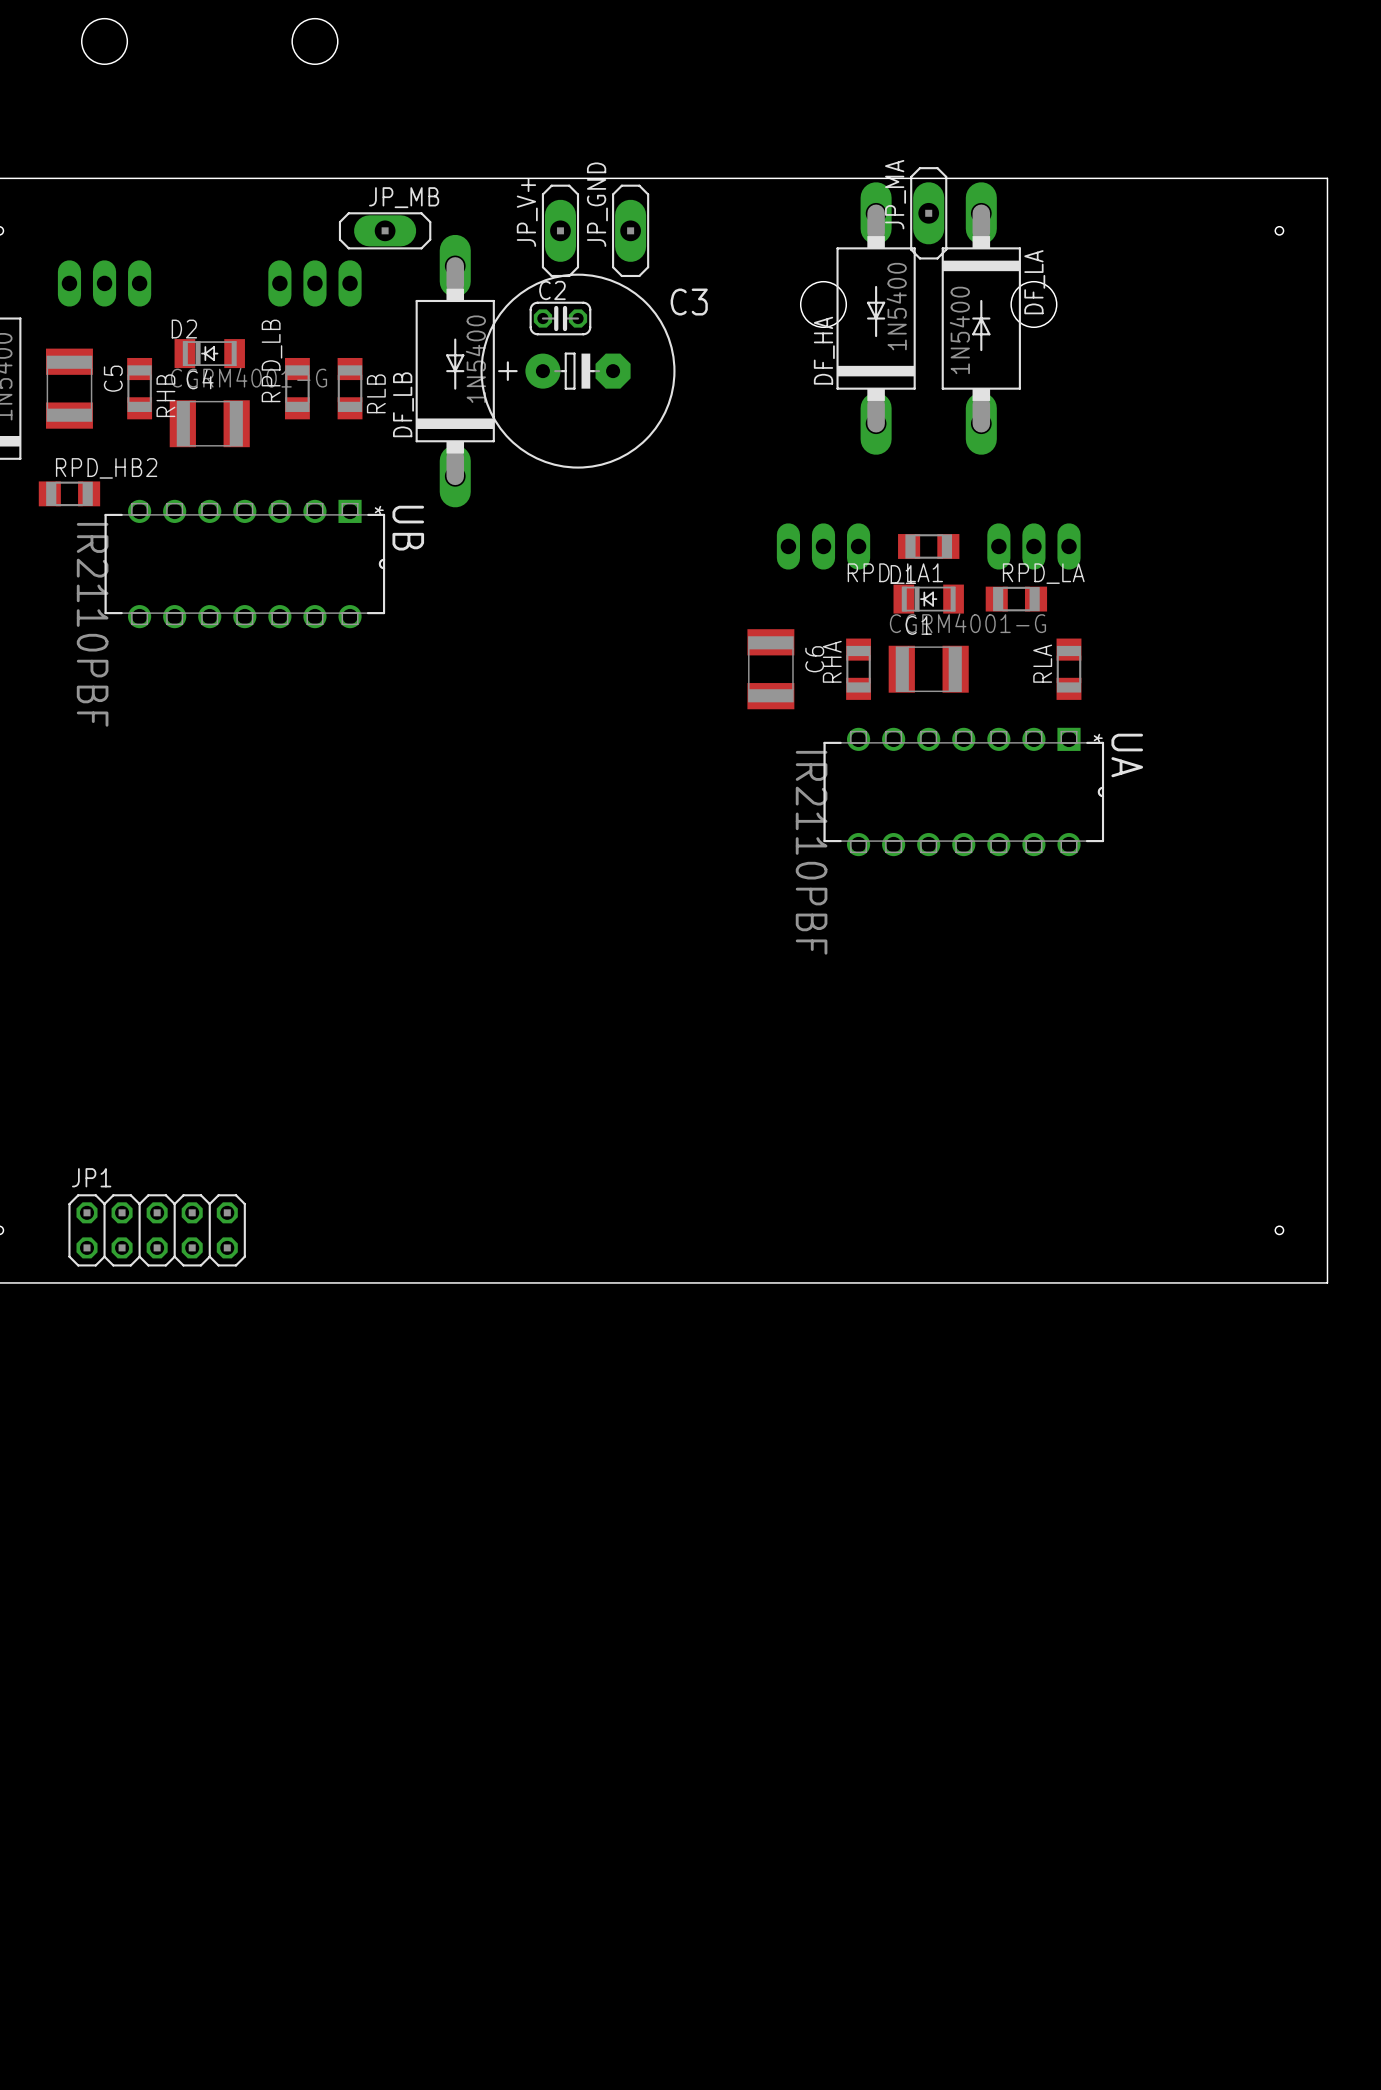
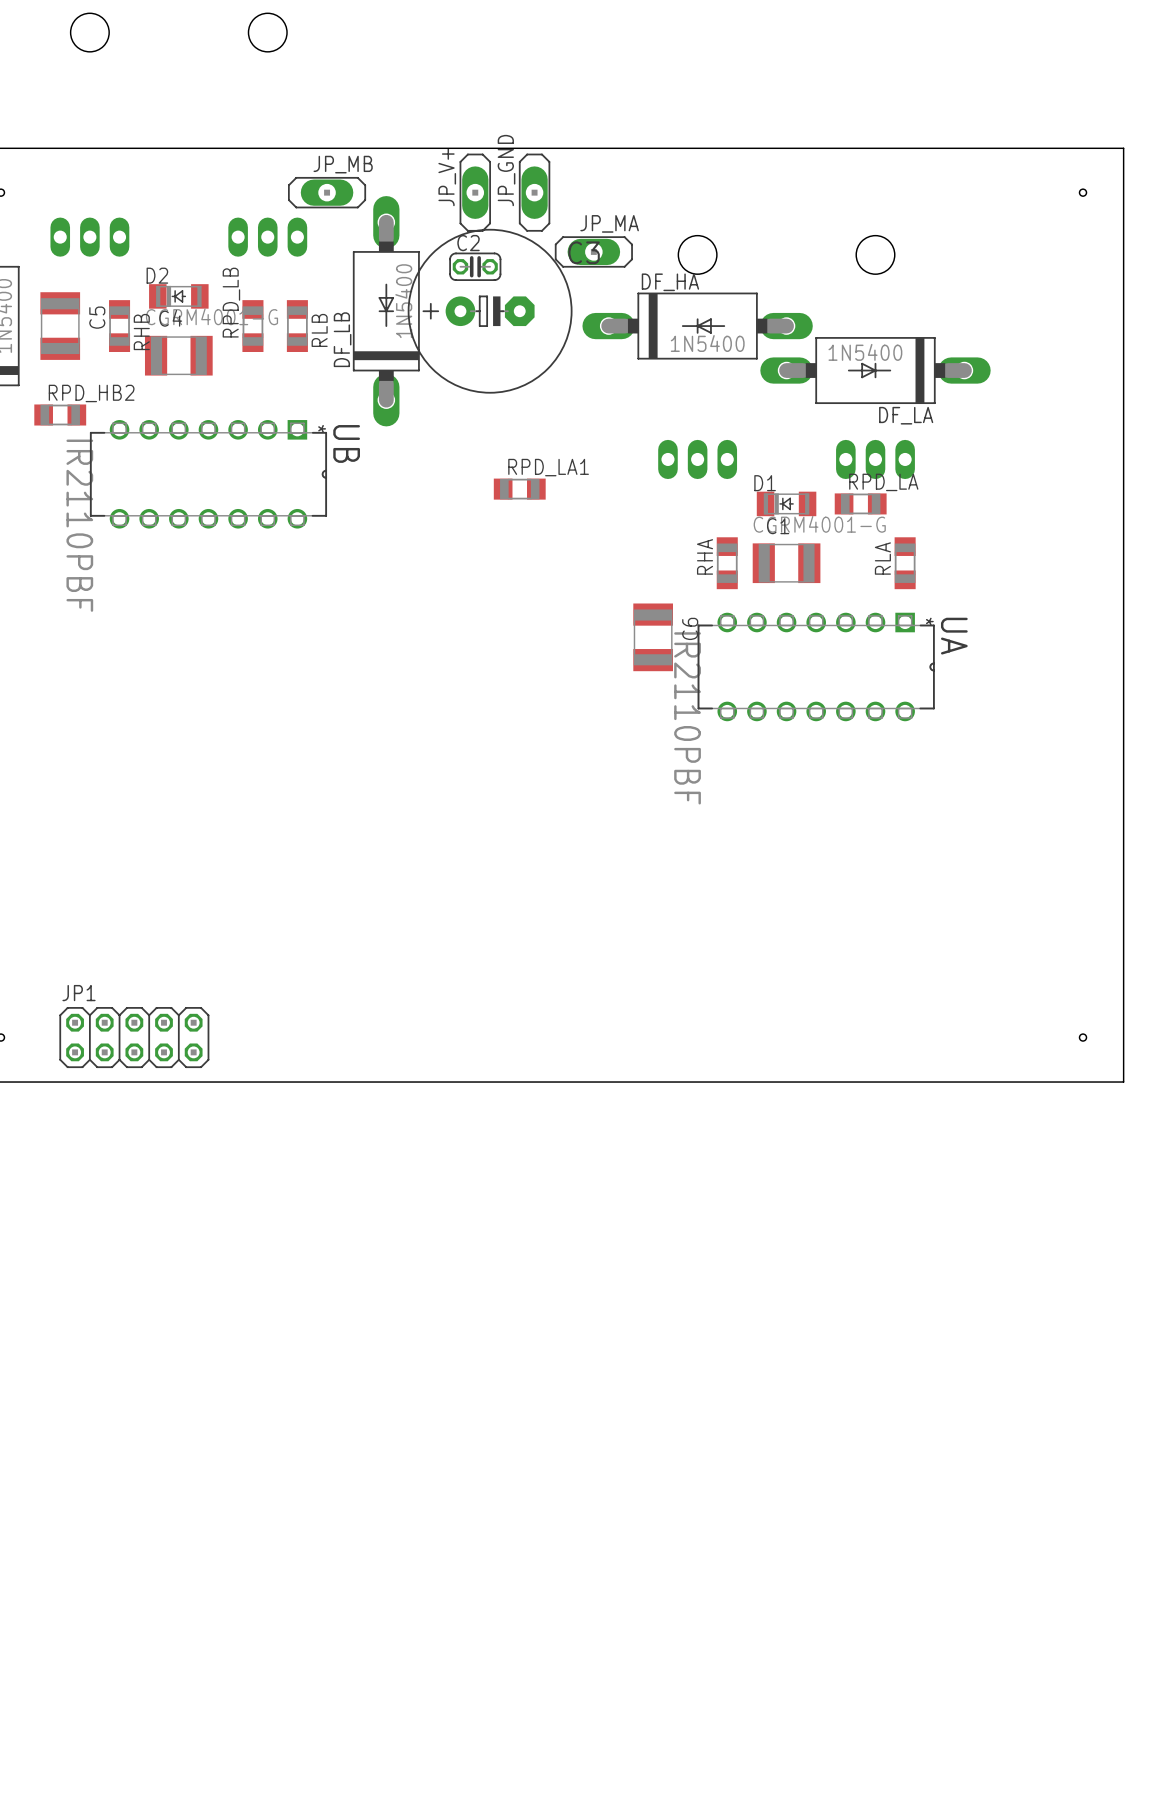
JP_MA rotation: 0° (928, 213) -> 90° clockwise (593, 251)
JP_MA position: (928, 213) -> (593, 251)
DF_HA rotation: 0° (876, 318) -> 90° clockwise (697, 326)
DF_LA rotation: 0° (981, 318) -> 90° clockwise (875, 370)
RPD_LA1 position: (928, 546) -> (519, 489)
RPD_LA1 name position: RPD_LA1 (895, 573) -> RPD_LA1 (548, 467)
C6 position: (770, 669) -> (653, 637)

